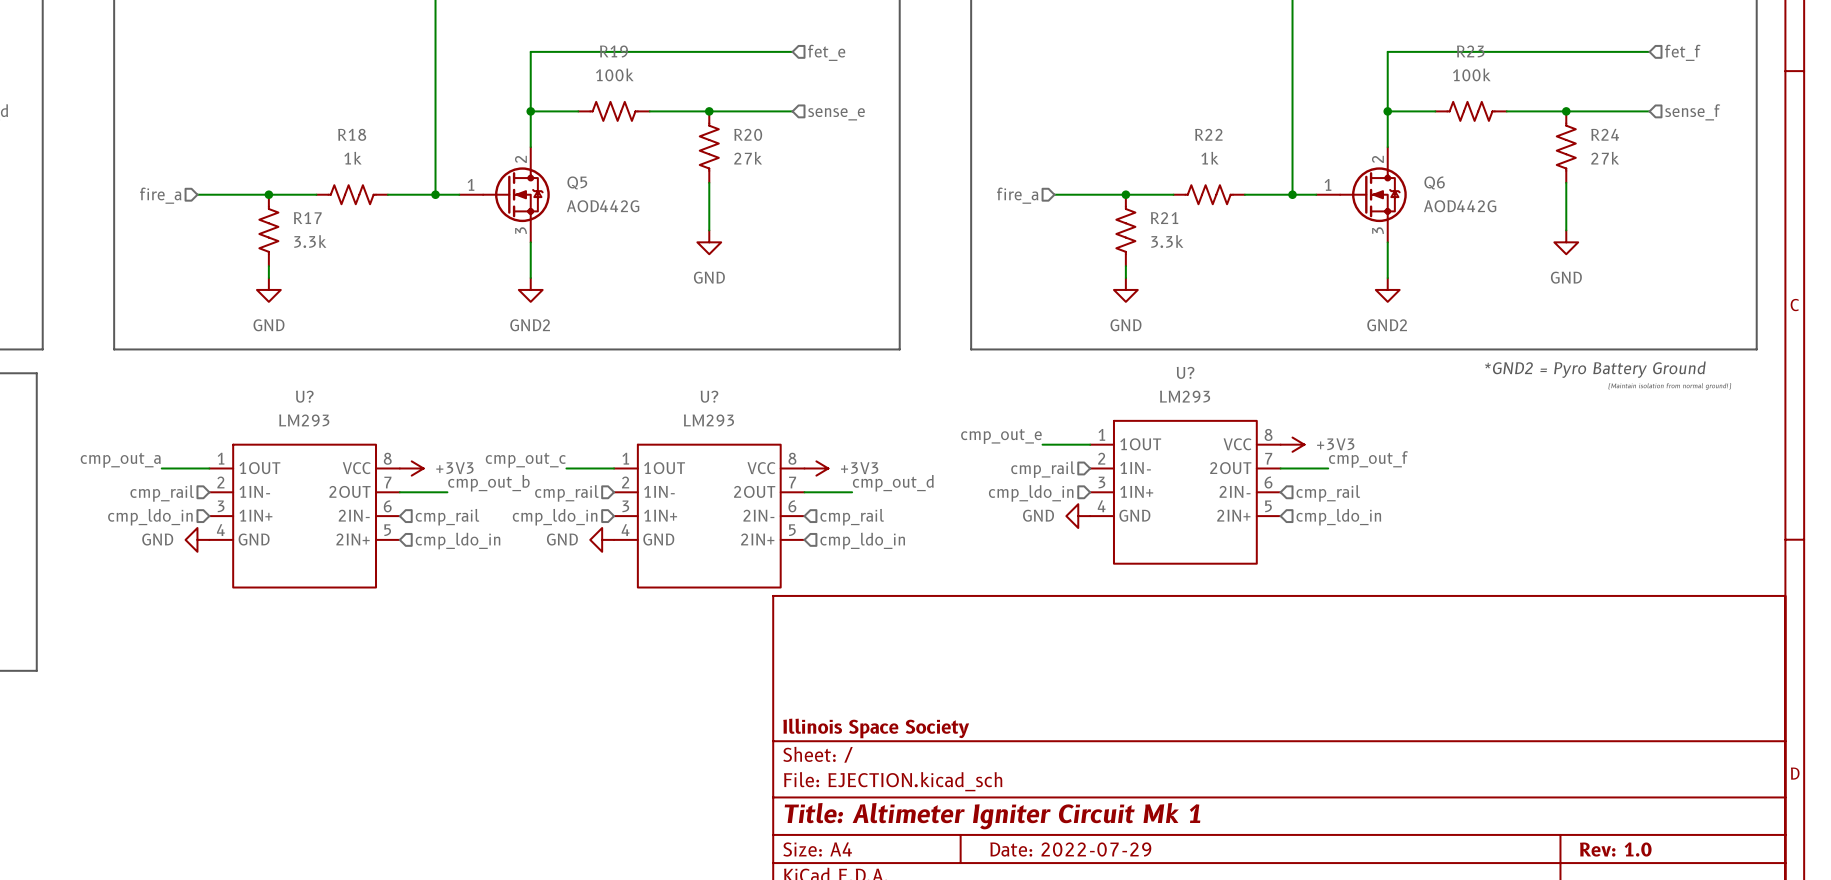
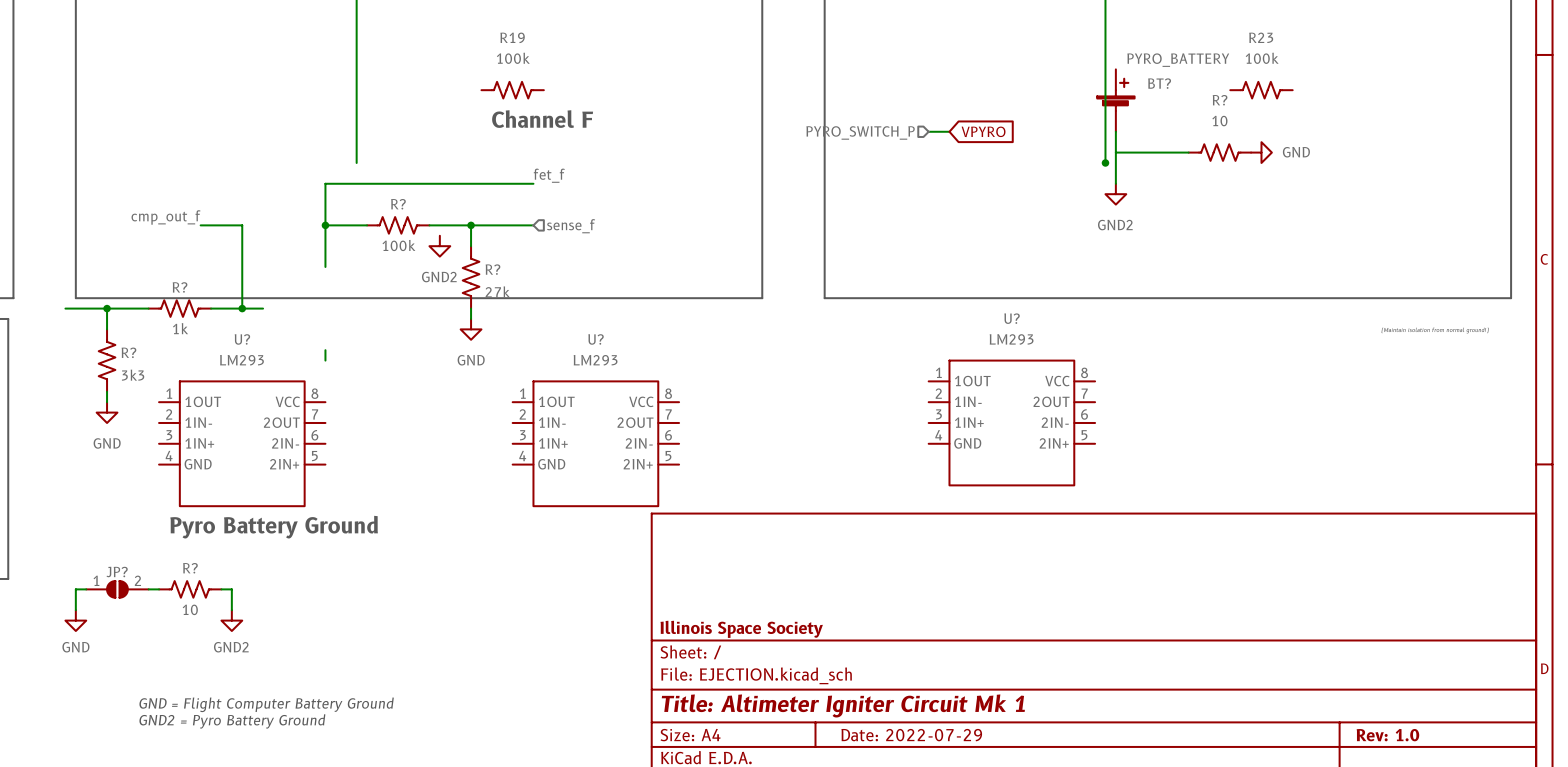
wire: (792, 51) (530, 51) (530, 147) -> none
wire: (1649, 51) (1387, 51) (1387, 147) -> none
hierarchical label: fet_e (826, 52) -> none
hierarchical label: fet_f (1682, 52) -> none
wire: (530, 111) (578, 111) -> (325, 225) (367, 225)
junction: (530, 111) -> none
wire: (649, 111) (792, 111) -> none
junction: (709, 111) -> none
wire: (1387, 111) (1435, 111) -> none
junction: (1387, 111) -> none
wire: (1506, 111) (1649, 111) -> none
junction: (1566, 111) -> none
hierarchical label: sense_f (1692, 112) -> none
hierarchical label: sense_e (836, 114) -> none
BT?: none -> PYRO_BATTERY (1115, 100)
text: none -> Channel F (542, 119)
R20: 27k (709, 147) -> none
R24: 27k (1566, 147) -> none
wire: none -> (928, 131) (949, 131)
global label: none -> VPYRO (983, 131)
wire: none -> (1115, 131) (1115, 183)
hierarchical label: none -> PYRO_SWITCH_P (860, 132)
wire: (709, 182) (709, 230) -> none
wire: none -> (1115, 152) (1188, 152)
R?: none -> 10 (1219, 152)
wire: (1566, 182) (1566, 230) -> none
wire: (197, 194) (316, 194) -> none
junction: (268, 194) -> none
R18: 1k (352, 194) -> none
wire: (387, 194) (459, 194) -> none
junction: (435, 194) -> none
Q5: AOD442G (504, 194) -> none
wire: (1054, 194) (1173, 194) -> none
junction: (1125, 194) -> none
R22: 1k (1209, 194) -> none
wire: (1244, 194) (1316, 194) -> none
Q6: AOD442G (1361, 194) -> none
hierarchical label: fire_a (160, 195) -> none
hierarchical label: fire_a (1017, 195) -> none
label: none -> fet_f (549, 175)
wire: none -> (533, 183) (325, 183) (325, 266)
R17: 3.3k (268, 230) -> none
R21: 3.3k (1125, 230) -> none
wire: (530, 242) (530, 278) -> none
power symbol: GND (709, 242) -> none
wire: (1387, 242) (1387, 278) -> none
power symbol rotation: 0° (1566, 242) -> 90° counterclockwise (1261, 152)
power symbol position: GND (1566, 242) -> GND (1261, 152)
label: none -> cmp_out_f (166, 217)
wire: none -> (200, 225) (242, 225) (242, 308)
wire: (268, 266) (268, 278) -> (325, 350) (325, 360)
junction: none -> (325, 225)
R?: none -> 100k (398, 225)
wire: none -> (429, 225) (533, 225)
wire: none -> (471, 225) (471, 246)
junction: none -> (471, 225)
wire: (1125, 266) (1125, 278) -> none
hierarchical label: none -> sense_f (571, 226)
power symbol: GND (268, 289) -> none
power symbol: GND (1125, 289) -> none
power symbol position: GND2 (1387, 289) -> GND2 (1115, 194)
R?: none -> 27k (471, 277)
wire: none -> (65, 308) (148, 308)
wire: none -> (107, 308) (107, 329)
junction: none -> (107, 308)
R?: none -> 1k (179, 308)
wire: none -> (211, 308) (263, 308)
junction: none -> (242, 308)
wire: none -> (471, 308) (471, 318)
text: *GND2 = Pyro Battery Ground (1595, 369) -> none
power symbol: none -> GND (471, 329)
R?: none -> 3k3 (107, 360)
label: cmp_out_e (1001, 436) -> none
wire: (1042, 444) (1090, 444) -> none
power symbol: +3V3 (1292, 444) -> none
wire: none -> (107, 391) (107, 402)
label: cmp_out_f (1368, 459) -> none
label: cmp_out_a (120, 460) -> none
label: cmp_out_c (525, 460) -> none
wire: (161, 468) (209, 468) -> none
power symbol: +3V3 (411, 468) -> none
wire: (566, 468) (614, 468) -> none
power symbol: +3V3 (816, 468) -> none
wire: (1280, 468) (1328, 468) -> none
hierarchical label: cmp_rail (1043, 469) -> none
label: cmp_out_b (488, 483) -> none
label: cmp_out_d (893, 483) -> none
wire: (399, 492) (447, 492) -> none
wire: (804, 492) (852, 492) -> none
hierarchical label: cmp_rail (162, 493) -> none
hierarchical label: cmp_rail (566, 493) -> none
hierarchical label: cmp_ldo_in (1031, 493) -> none
hierarchical label: cmp_rail (1328, 493) -> none
power symbol: GND (1078, 516) -> none
hierarchical label: cmp_ldo_in (150, 517) -> none
hierarchical label: cmp_rail (447, 517) -> none
hierarchical label: cmp_ldo_in (555, 517) -> none
hierarchical label: cmp_rail (852, 517) -> none
hierarchical label: cmp_ldo_in (1338, 517) -> none
power symbol rotation: 0° (197, 539) -> 90° counterclockwise (107, 412)
power symbol position: GND (197, 539) -> GND (107, 412)
power symbol: GND (602, 539) -> none
hierarchical label: cmp_ldo_in (457, 541) -> none
hierarchical label: cmp_ldo_in (862, 541) -> none
text: none -> Pyro Battery Ground (274, 527)
wire: none -> (86, 589) (75, 589) (75, 610)
JP?: none -> (117, 589)
wire: none -> (148, 589) (159, 589)
R?: none -> 10 (190, 589)
wire: none -> (221, 589) (231, 589) (231, 610)
power symbol: none -> GND (75, 620)
power symbol: none -> GND2 (231, 620)
text: none -> GND = Flight Computer Battery Ground (266, 704)
text: none -> GND2 = Pyro Battery Ground (232, 721)

